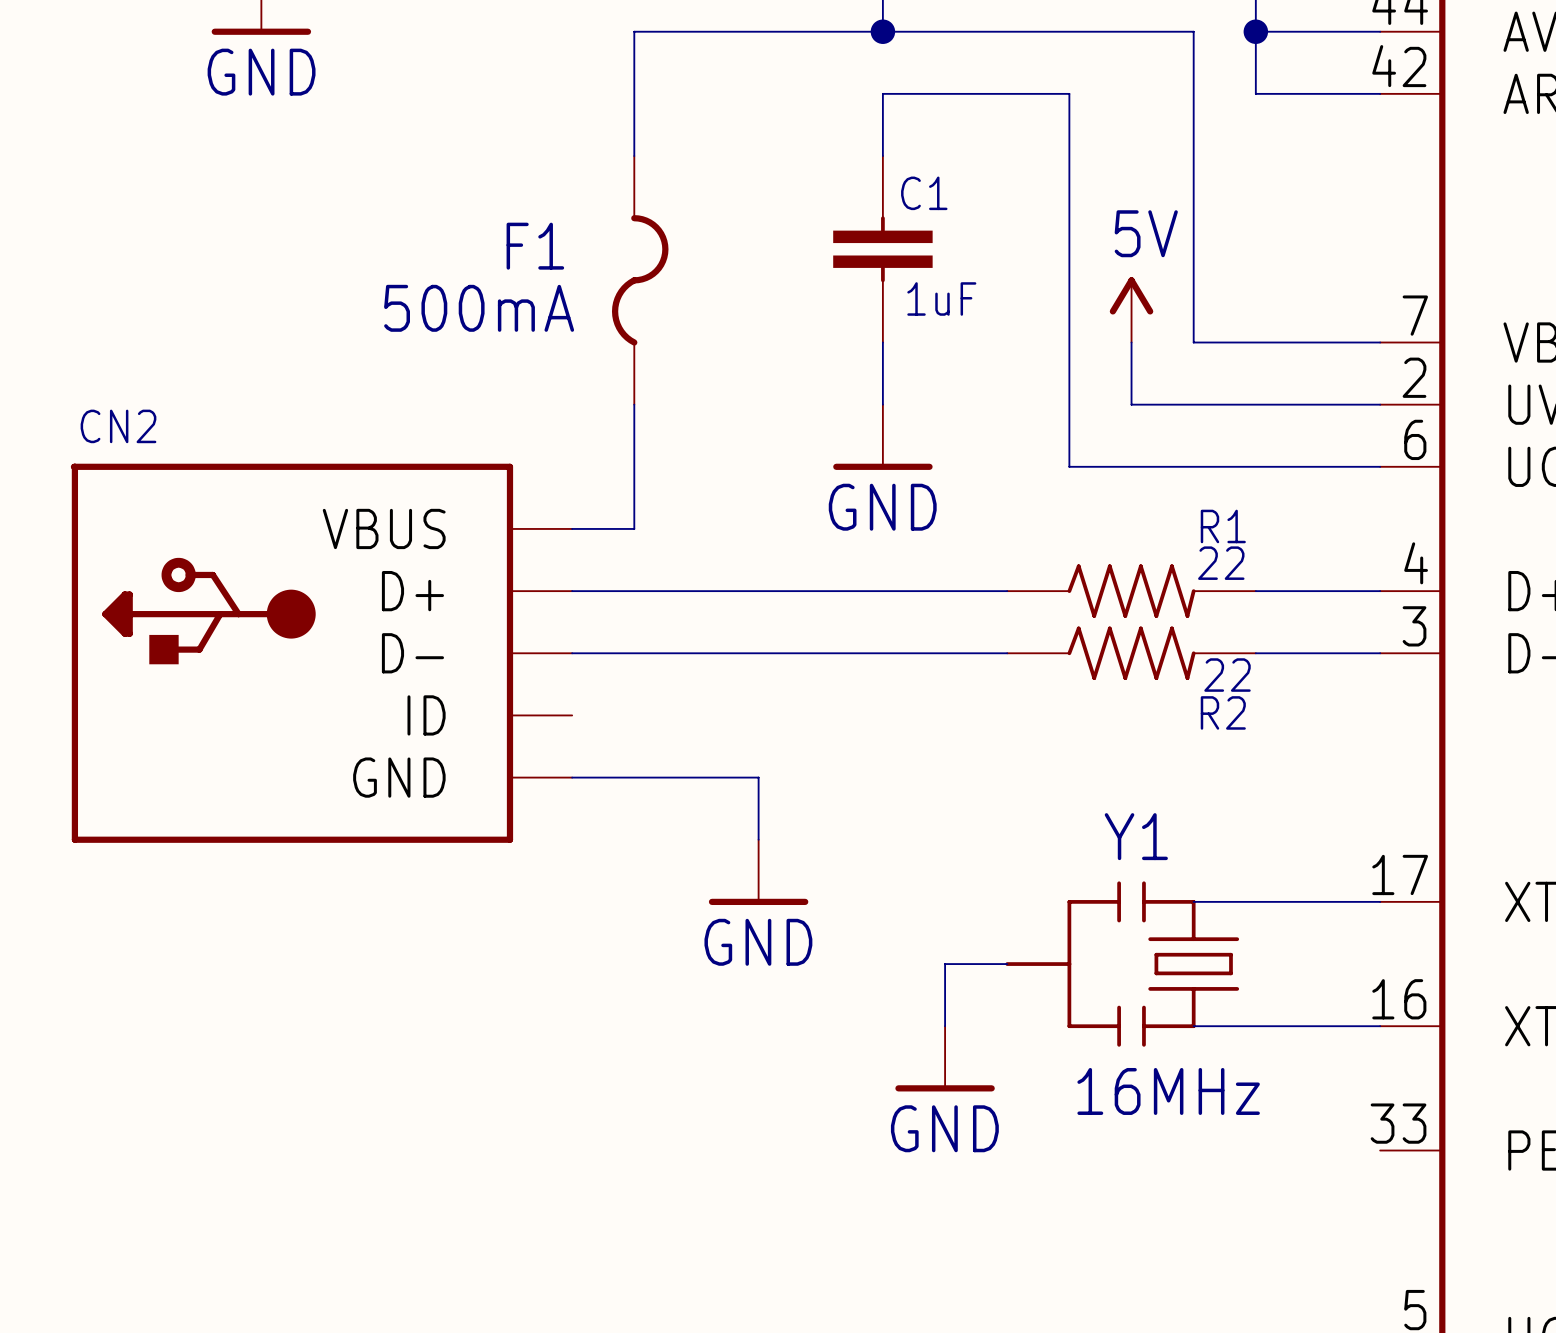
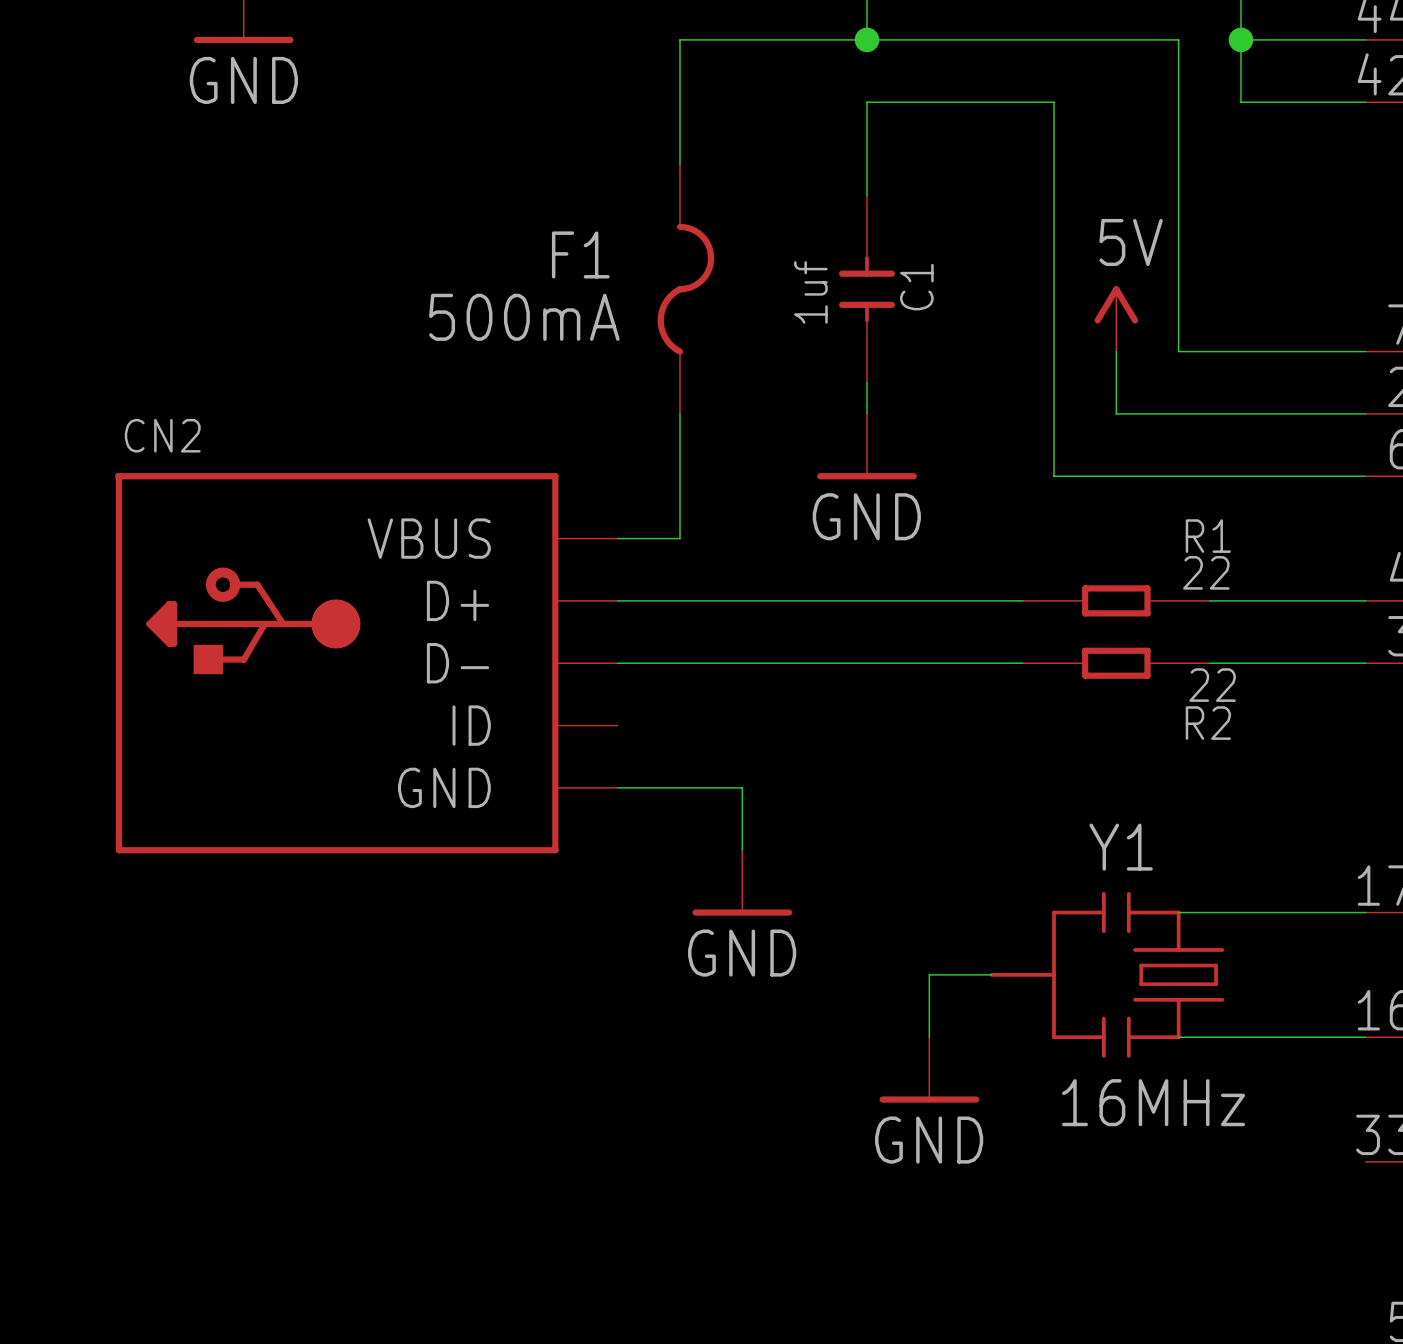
wire: (696, 31) (634, 31) (634, 156) -> (680, 39) (680, 164)
C1 symbol: [833, 156, 933, 343] -> [838, 195, 896, 383]
C1 name position: C1 (924, 193) -> C1 (916, 287)
F1 position: (640, 280) -> (685, 289)
C1 value: 1uF (941, 299) -> 1uf (810, 292)
wire: (634, 404) (634, 528) (572, 528) -> (680, 413) (680, 538) (617, 538)
R1 symbol: [1007, 564, 1256, 618] -> [1022, 585, 1210, 617]
R2 symbol: [1007, 626, 1256, 681] -> [1022, 647, 1210, 679]
CN2 position: (321, 653) -> (366, 663)

